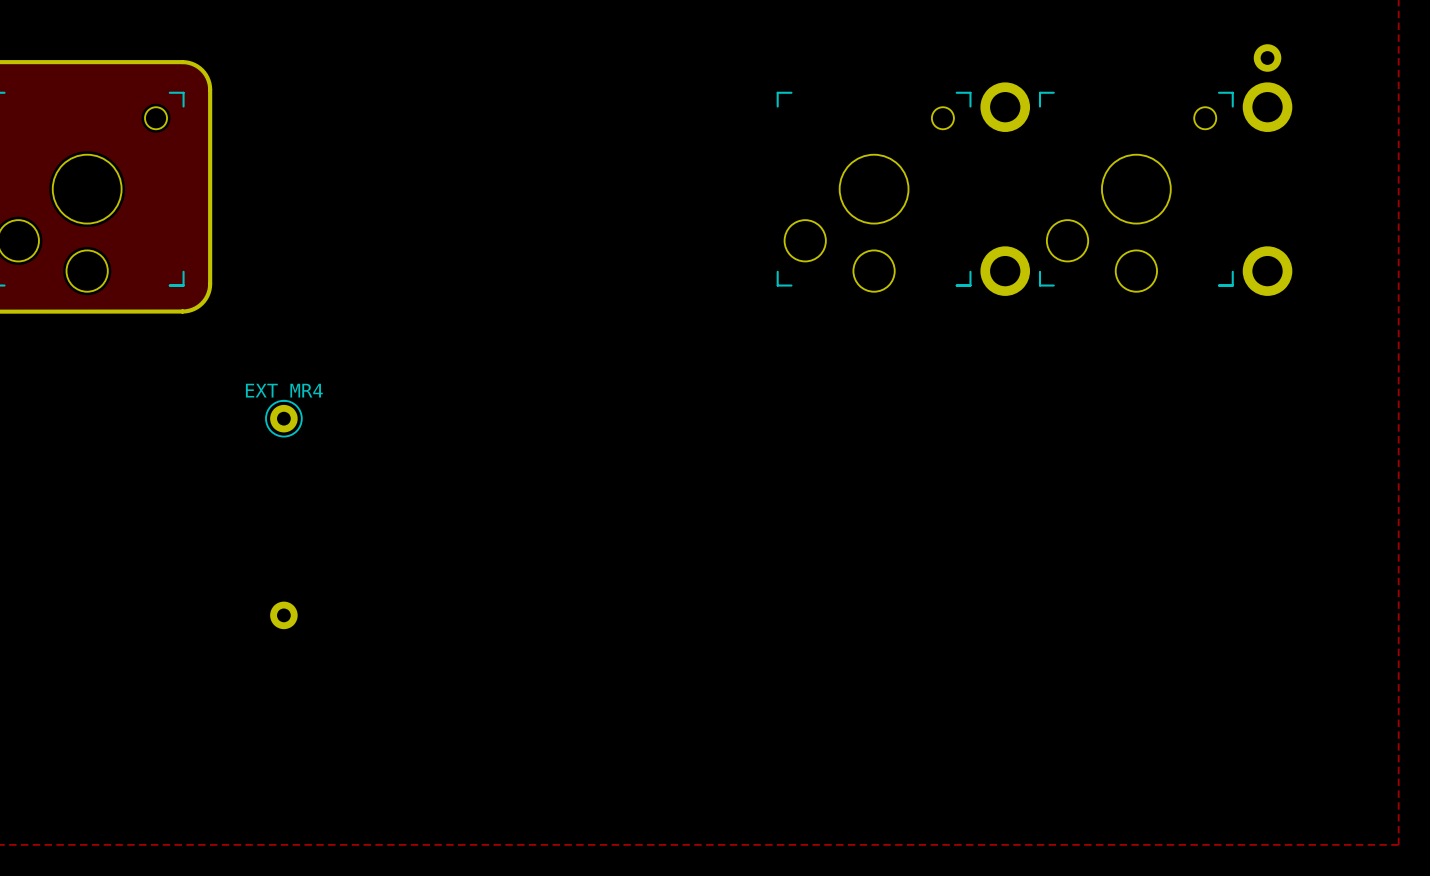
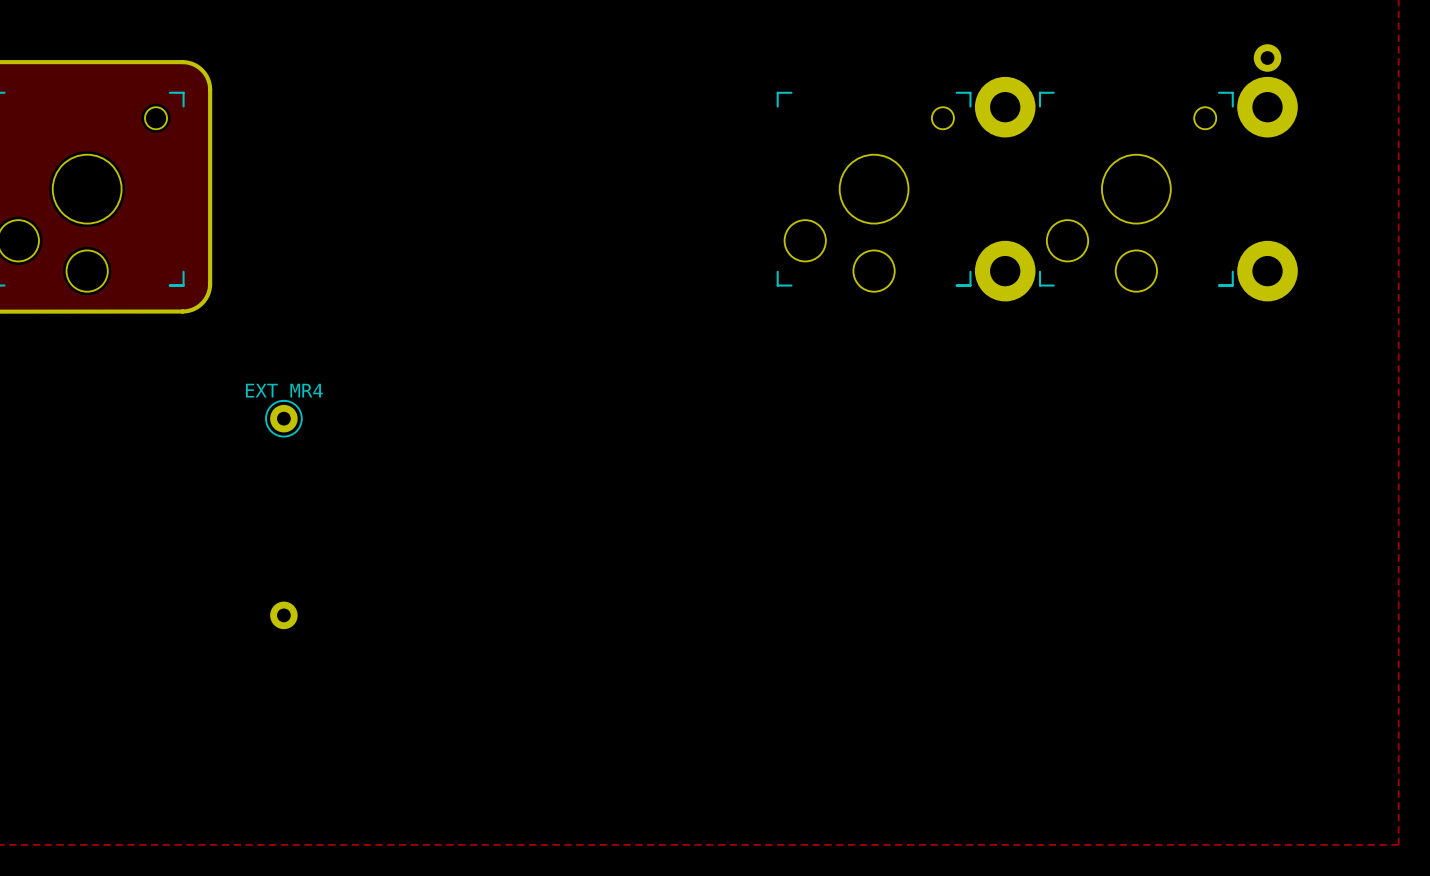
part footprint: [980, 82, 1031, 132] -> [974, 76, 1036, 138]
part footprint: [1242, 82, 1293, 132] -> [1237, 76, 1298, 138]
part footprint: [980, 246, 1031, 296] -> [974, 240, 1036, 302]
part footprint: [1242, 246, 1293, 296] -> [1237, 240, 1298, 302]

